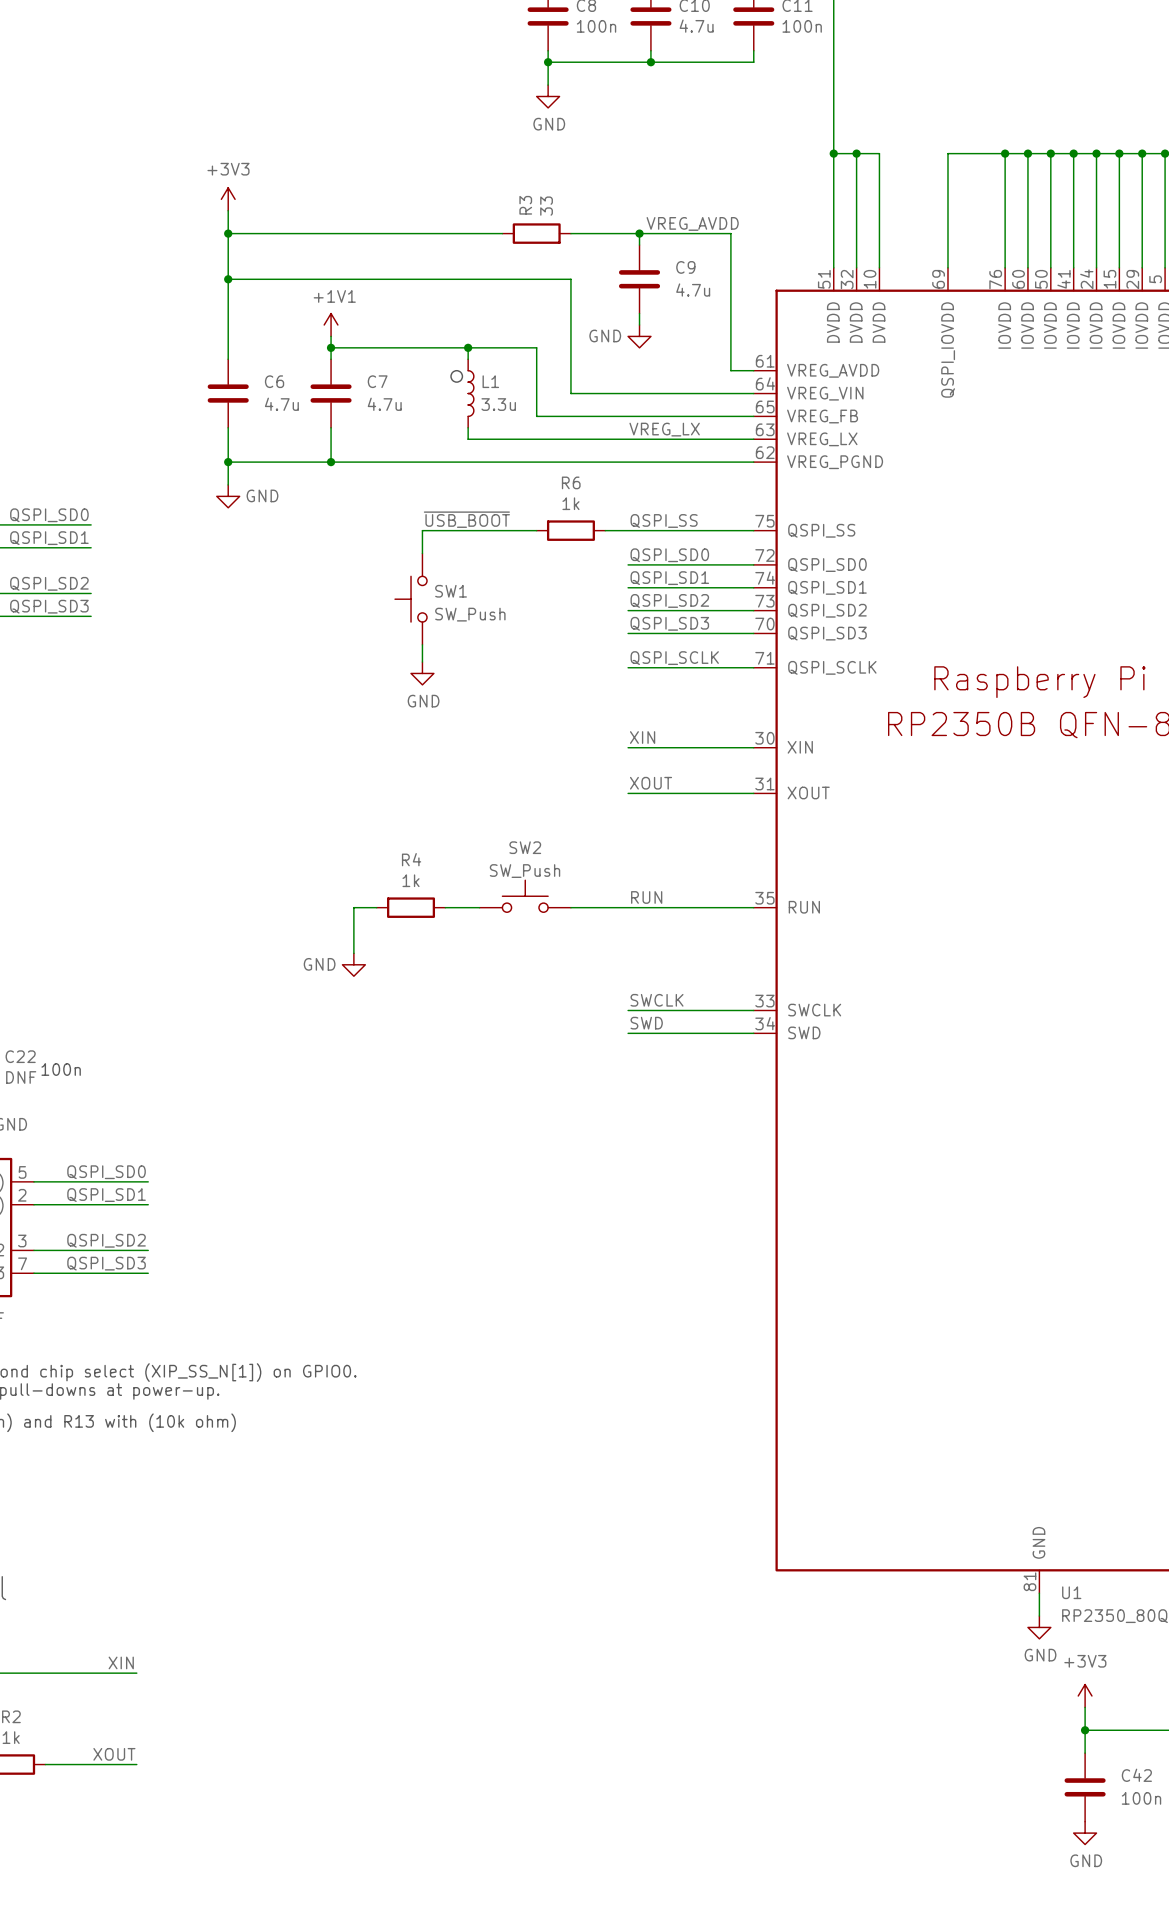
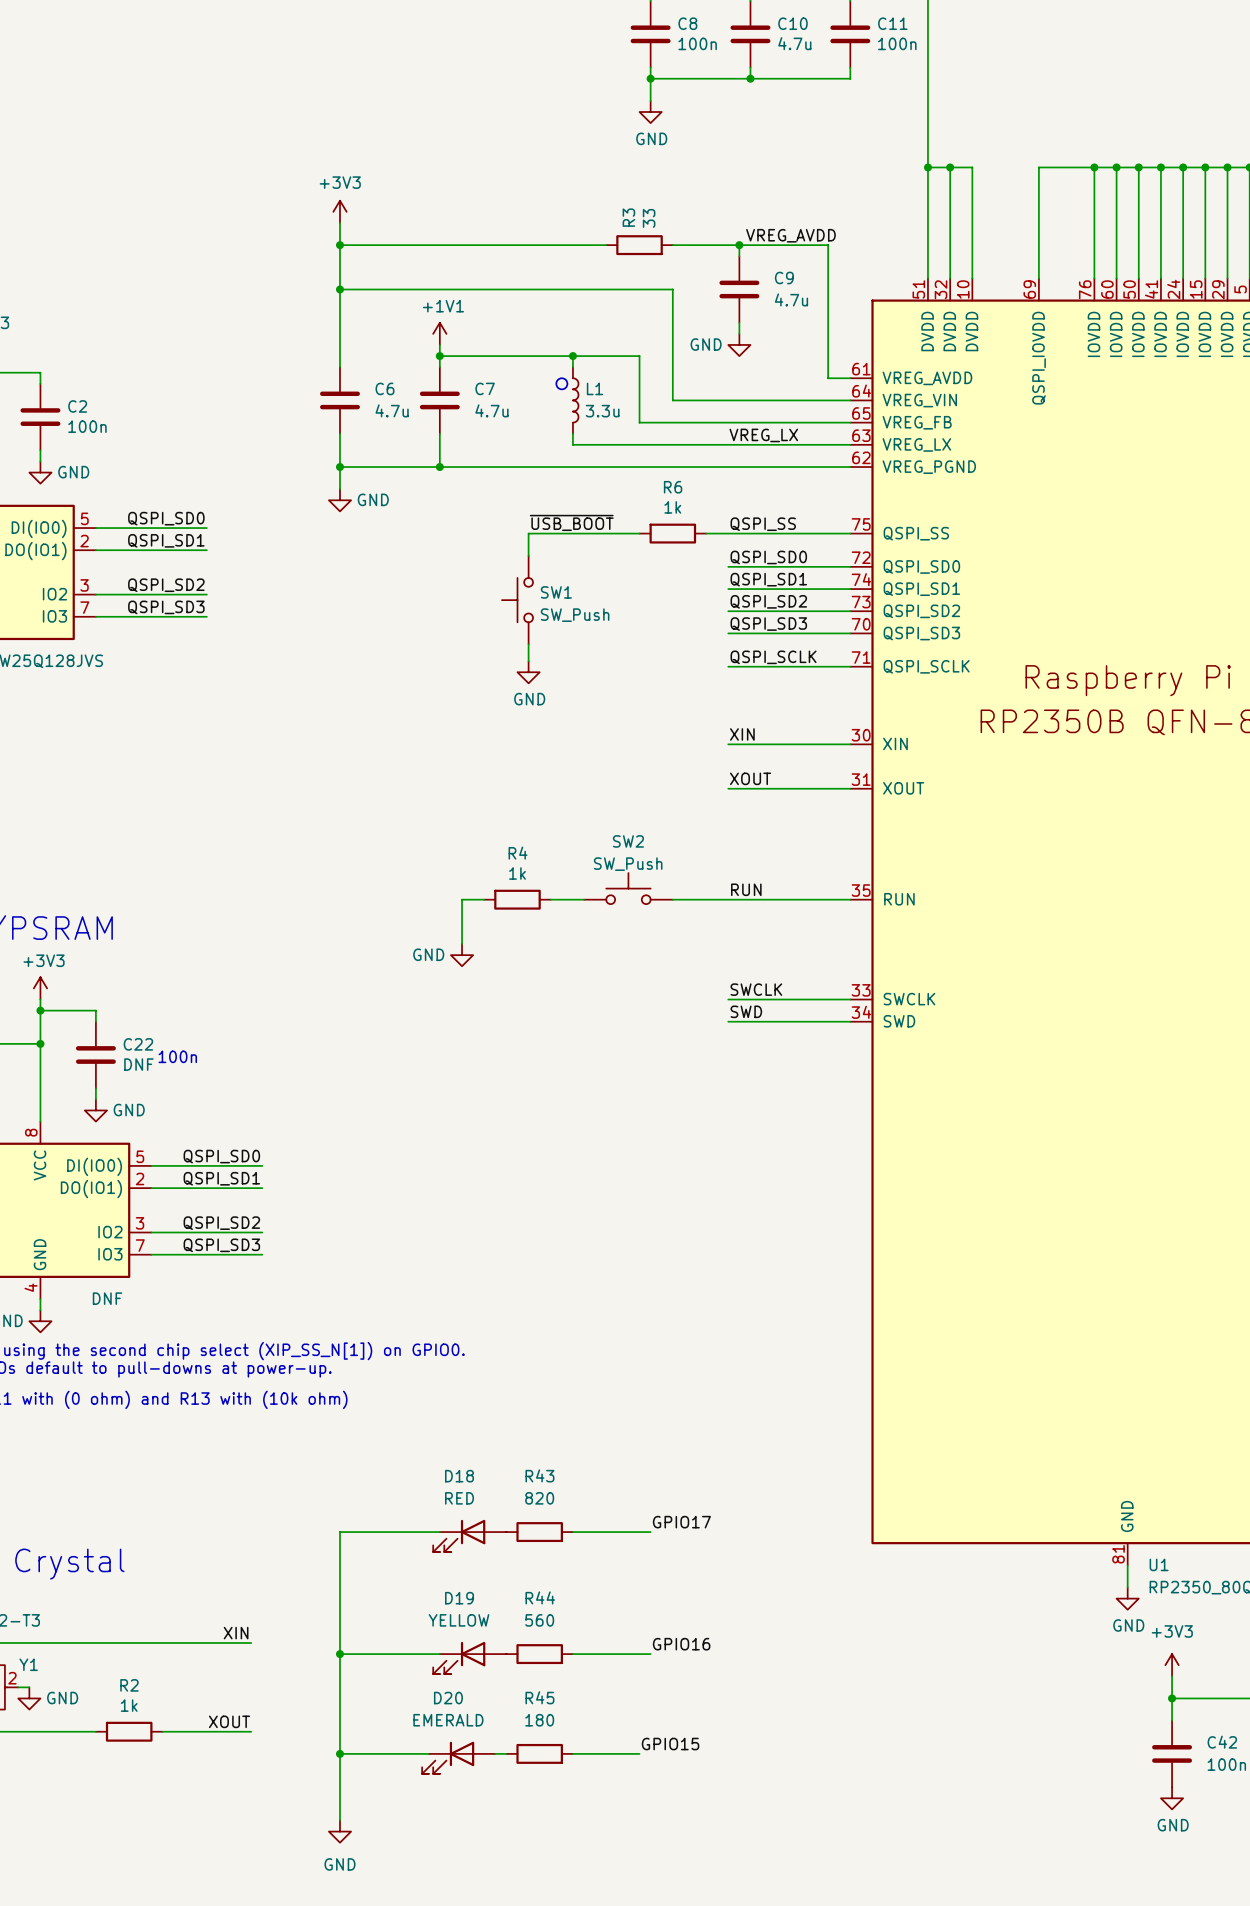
label: none -> GPIO17 (681, 1522)
wire: none -> (439, 1532) (339, 1532) (339, 1820)
R43: none -> 820 (539, 1532)
wire: none -> (572, 1532) (650, 1532)
D18: none -> RED (469, 1535)
label: none -> GPIO16 (681, 1644)
wire: none -> (339, 1654) (439, 1654)
junction: none -> (339, 1654)
R44: none -> 560 (539, 1654)
wire: none -> (572, 1654) (650, 1654)
D19: none -> YELLOW (469, 1657)
label: none -> GPIO15 (670, 1744)
wire: none -> (339, 1753) (428, 1753)
junction: none -> (339, 1753)
wire: none -> (495, 1753) (506, 1753)
R45: none -> 180 (539, 1753)
wire: none -> (572, 1753) (639, 1753)
D20: none -> EMERALD (458, 1757)
power symbol: none -> GND (339, 1831)

